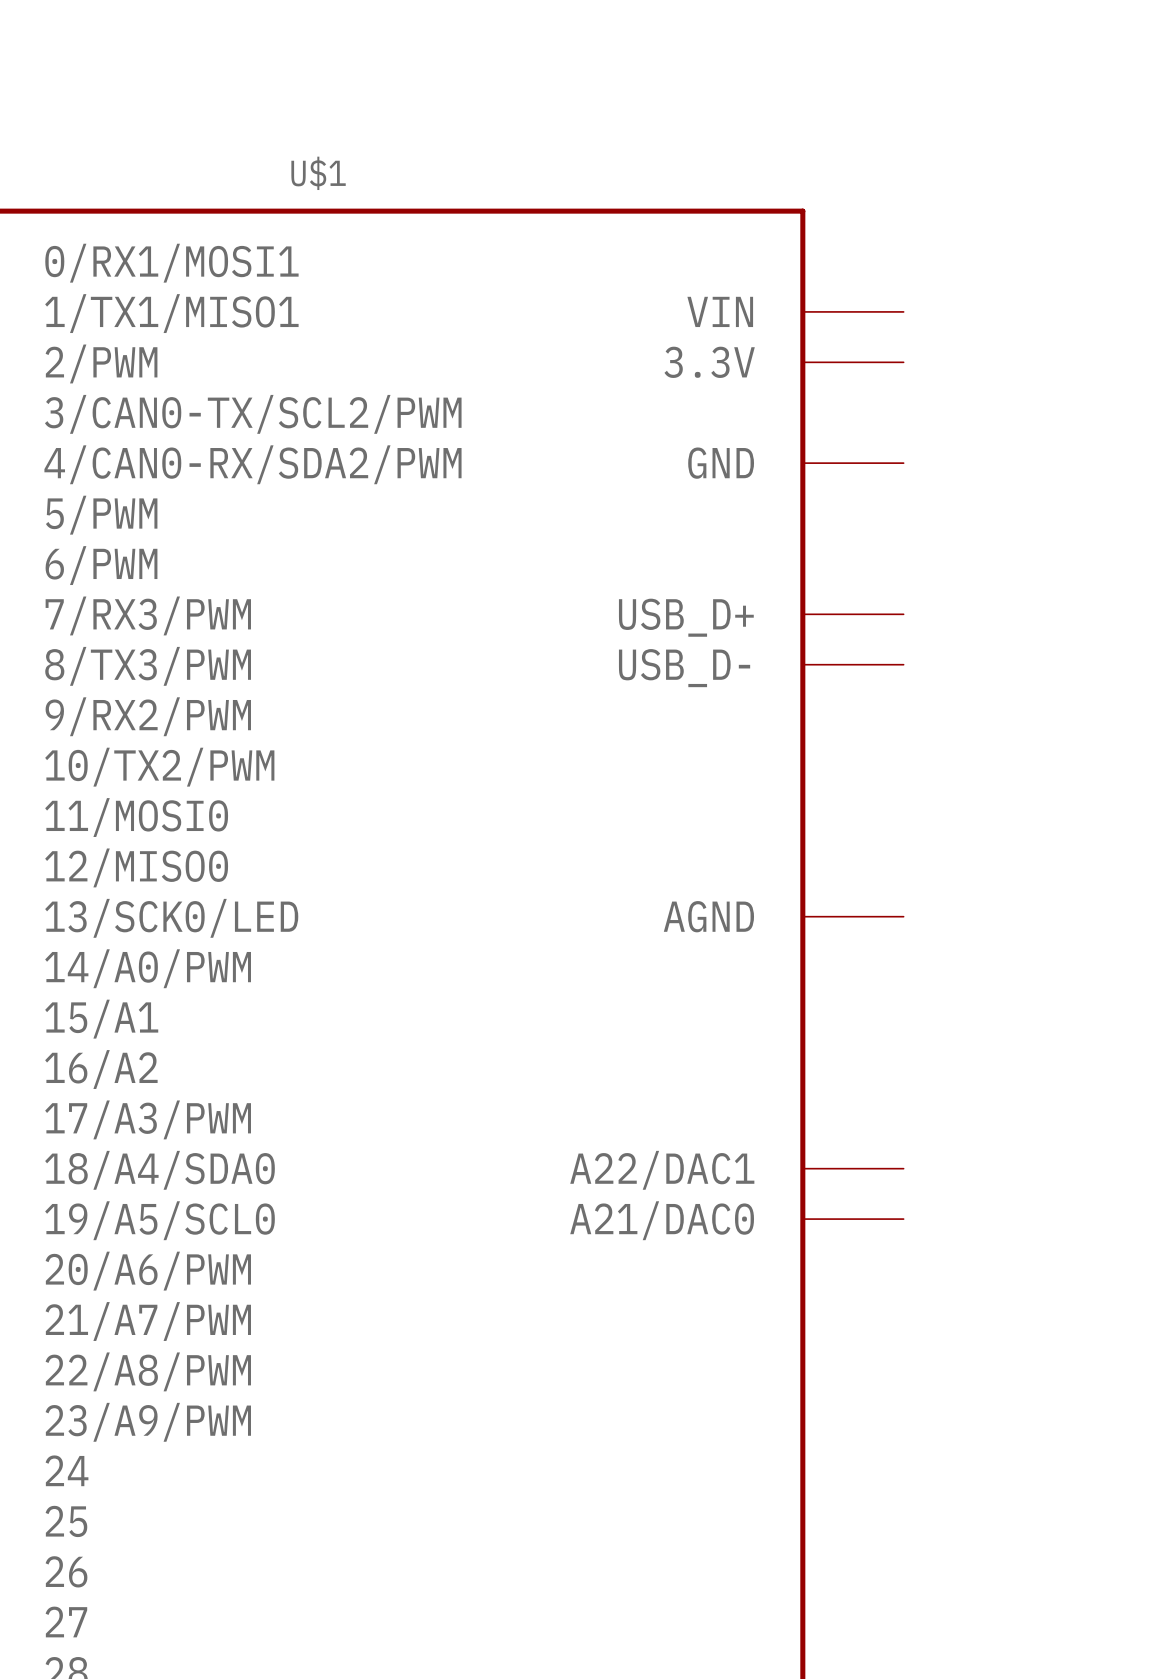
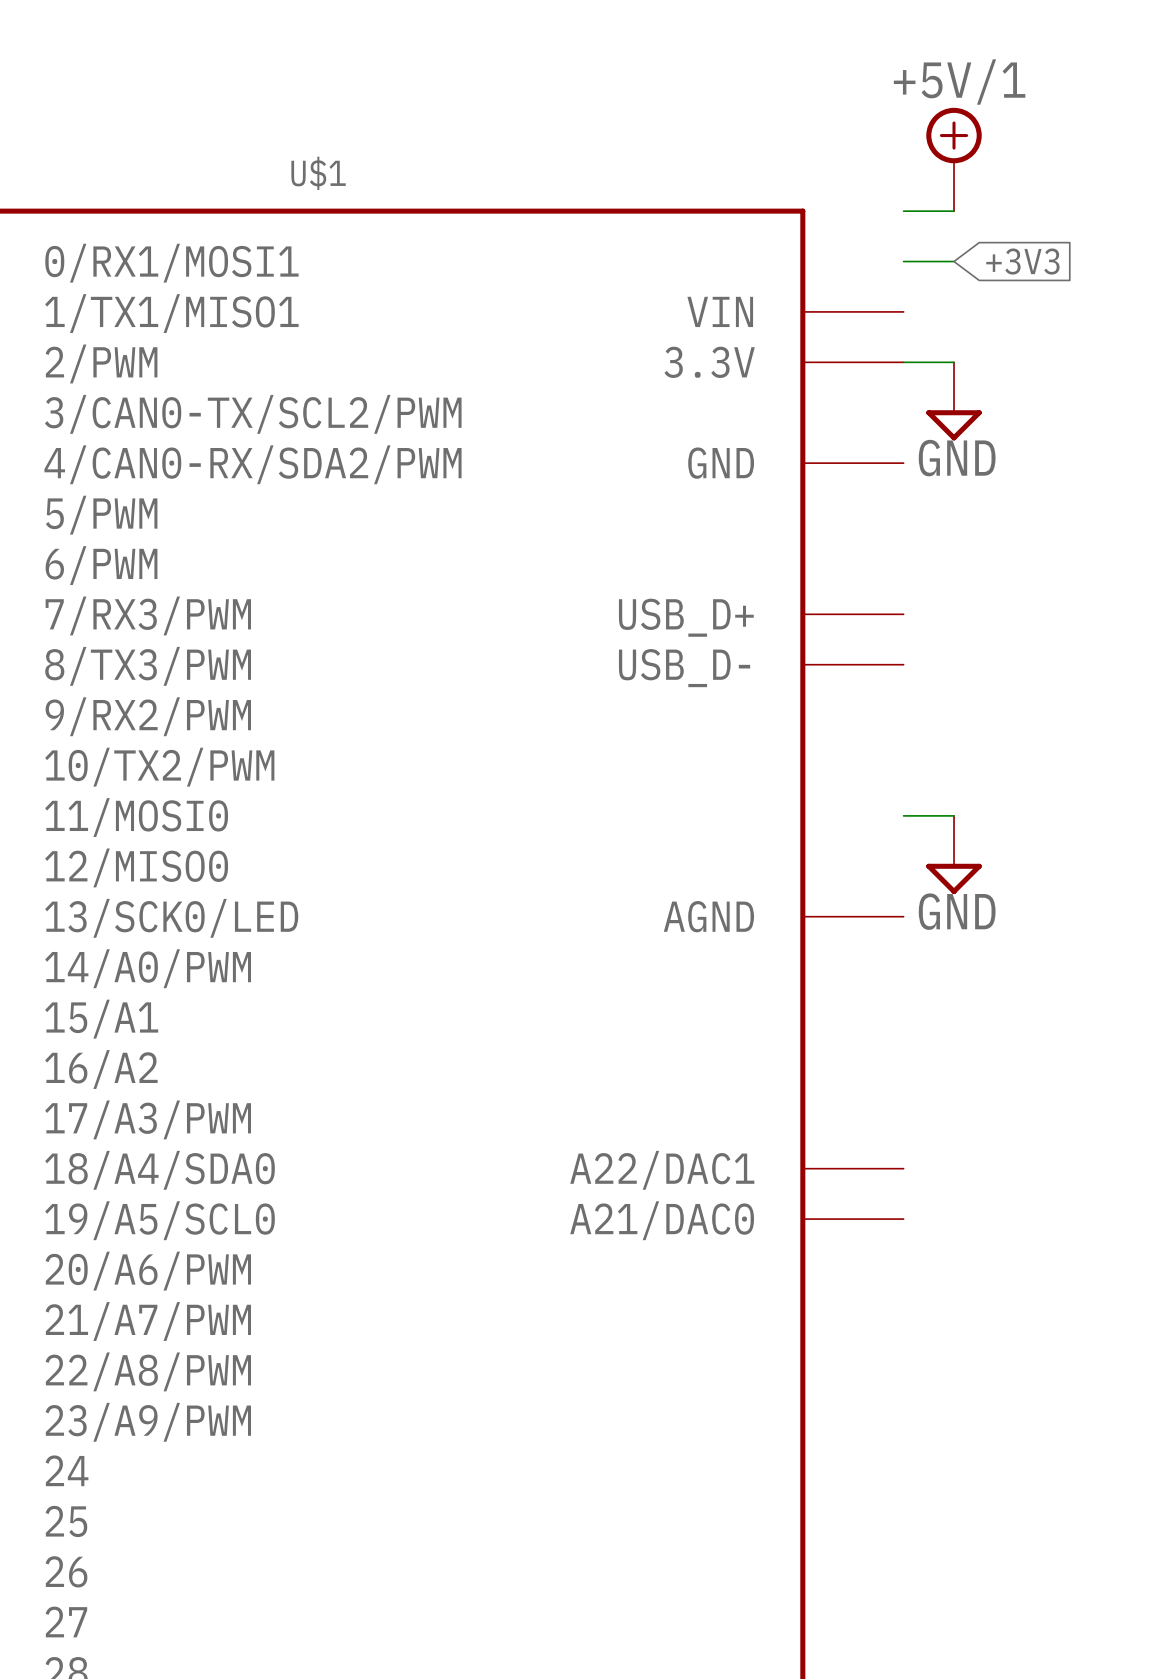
power symbol: none -> +5V/1 (954, 159)
wire: none -> (903, 211) (954, 211)
wire: none -> (903, 261) (954, 261)
global label: none -> +3V3 (1022, 261)
wire: none -> (903, 362) (954, 362)
power symbol: none -> GND (954, 401)
wire: none -> (903, 815) (954, 815)
power symbol: none -> GND (954, 854)

